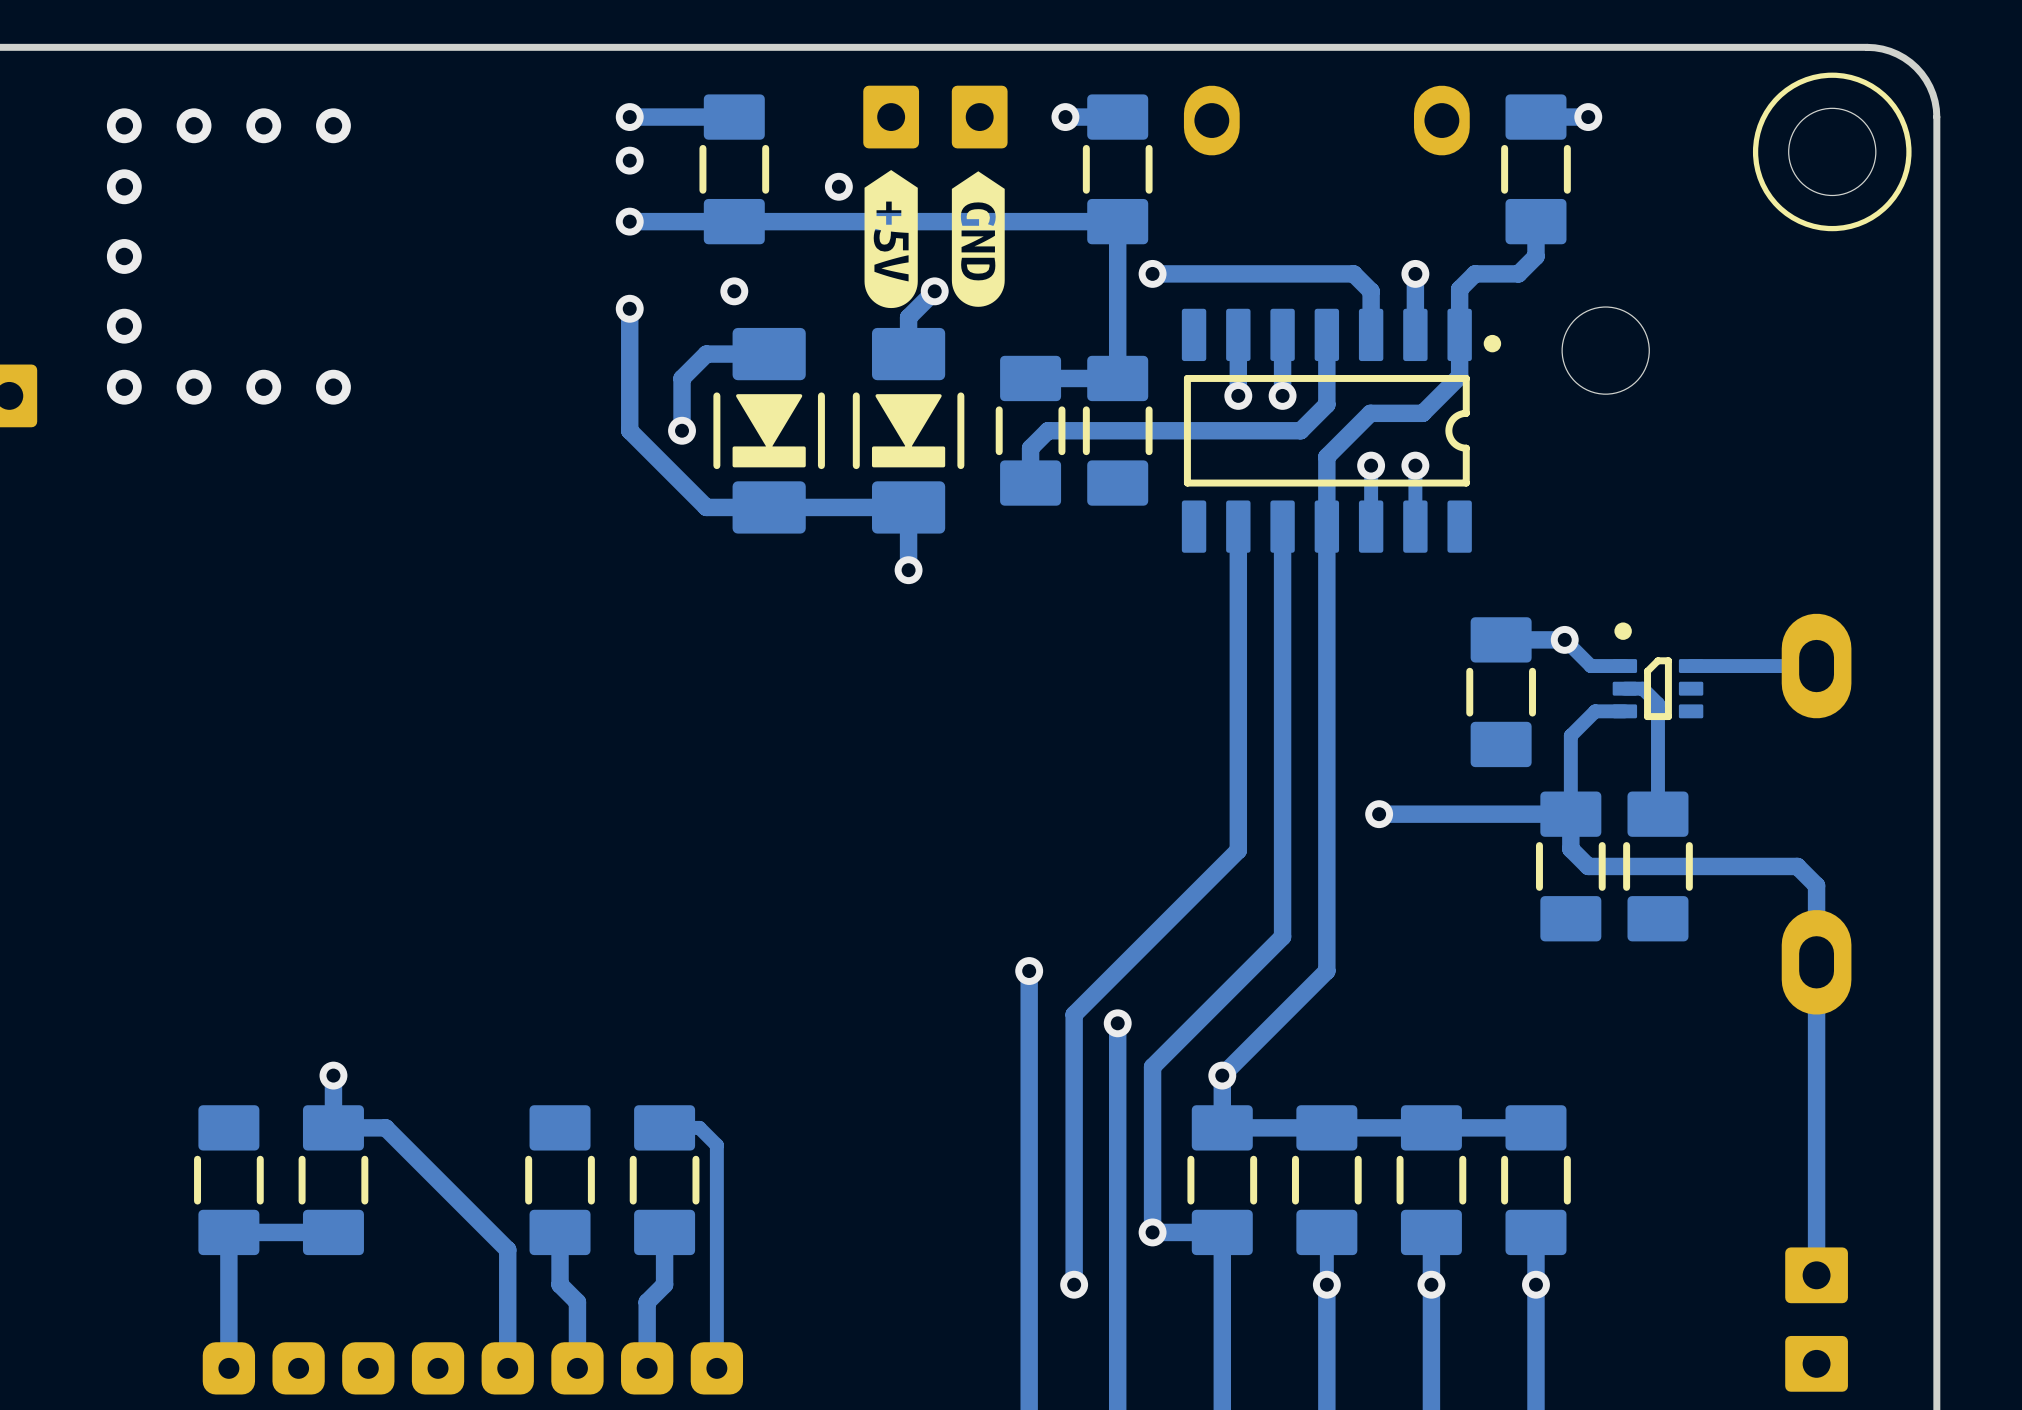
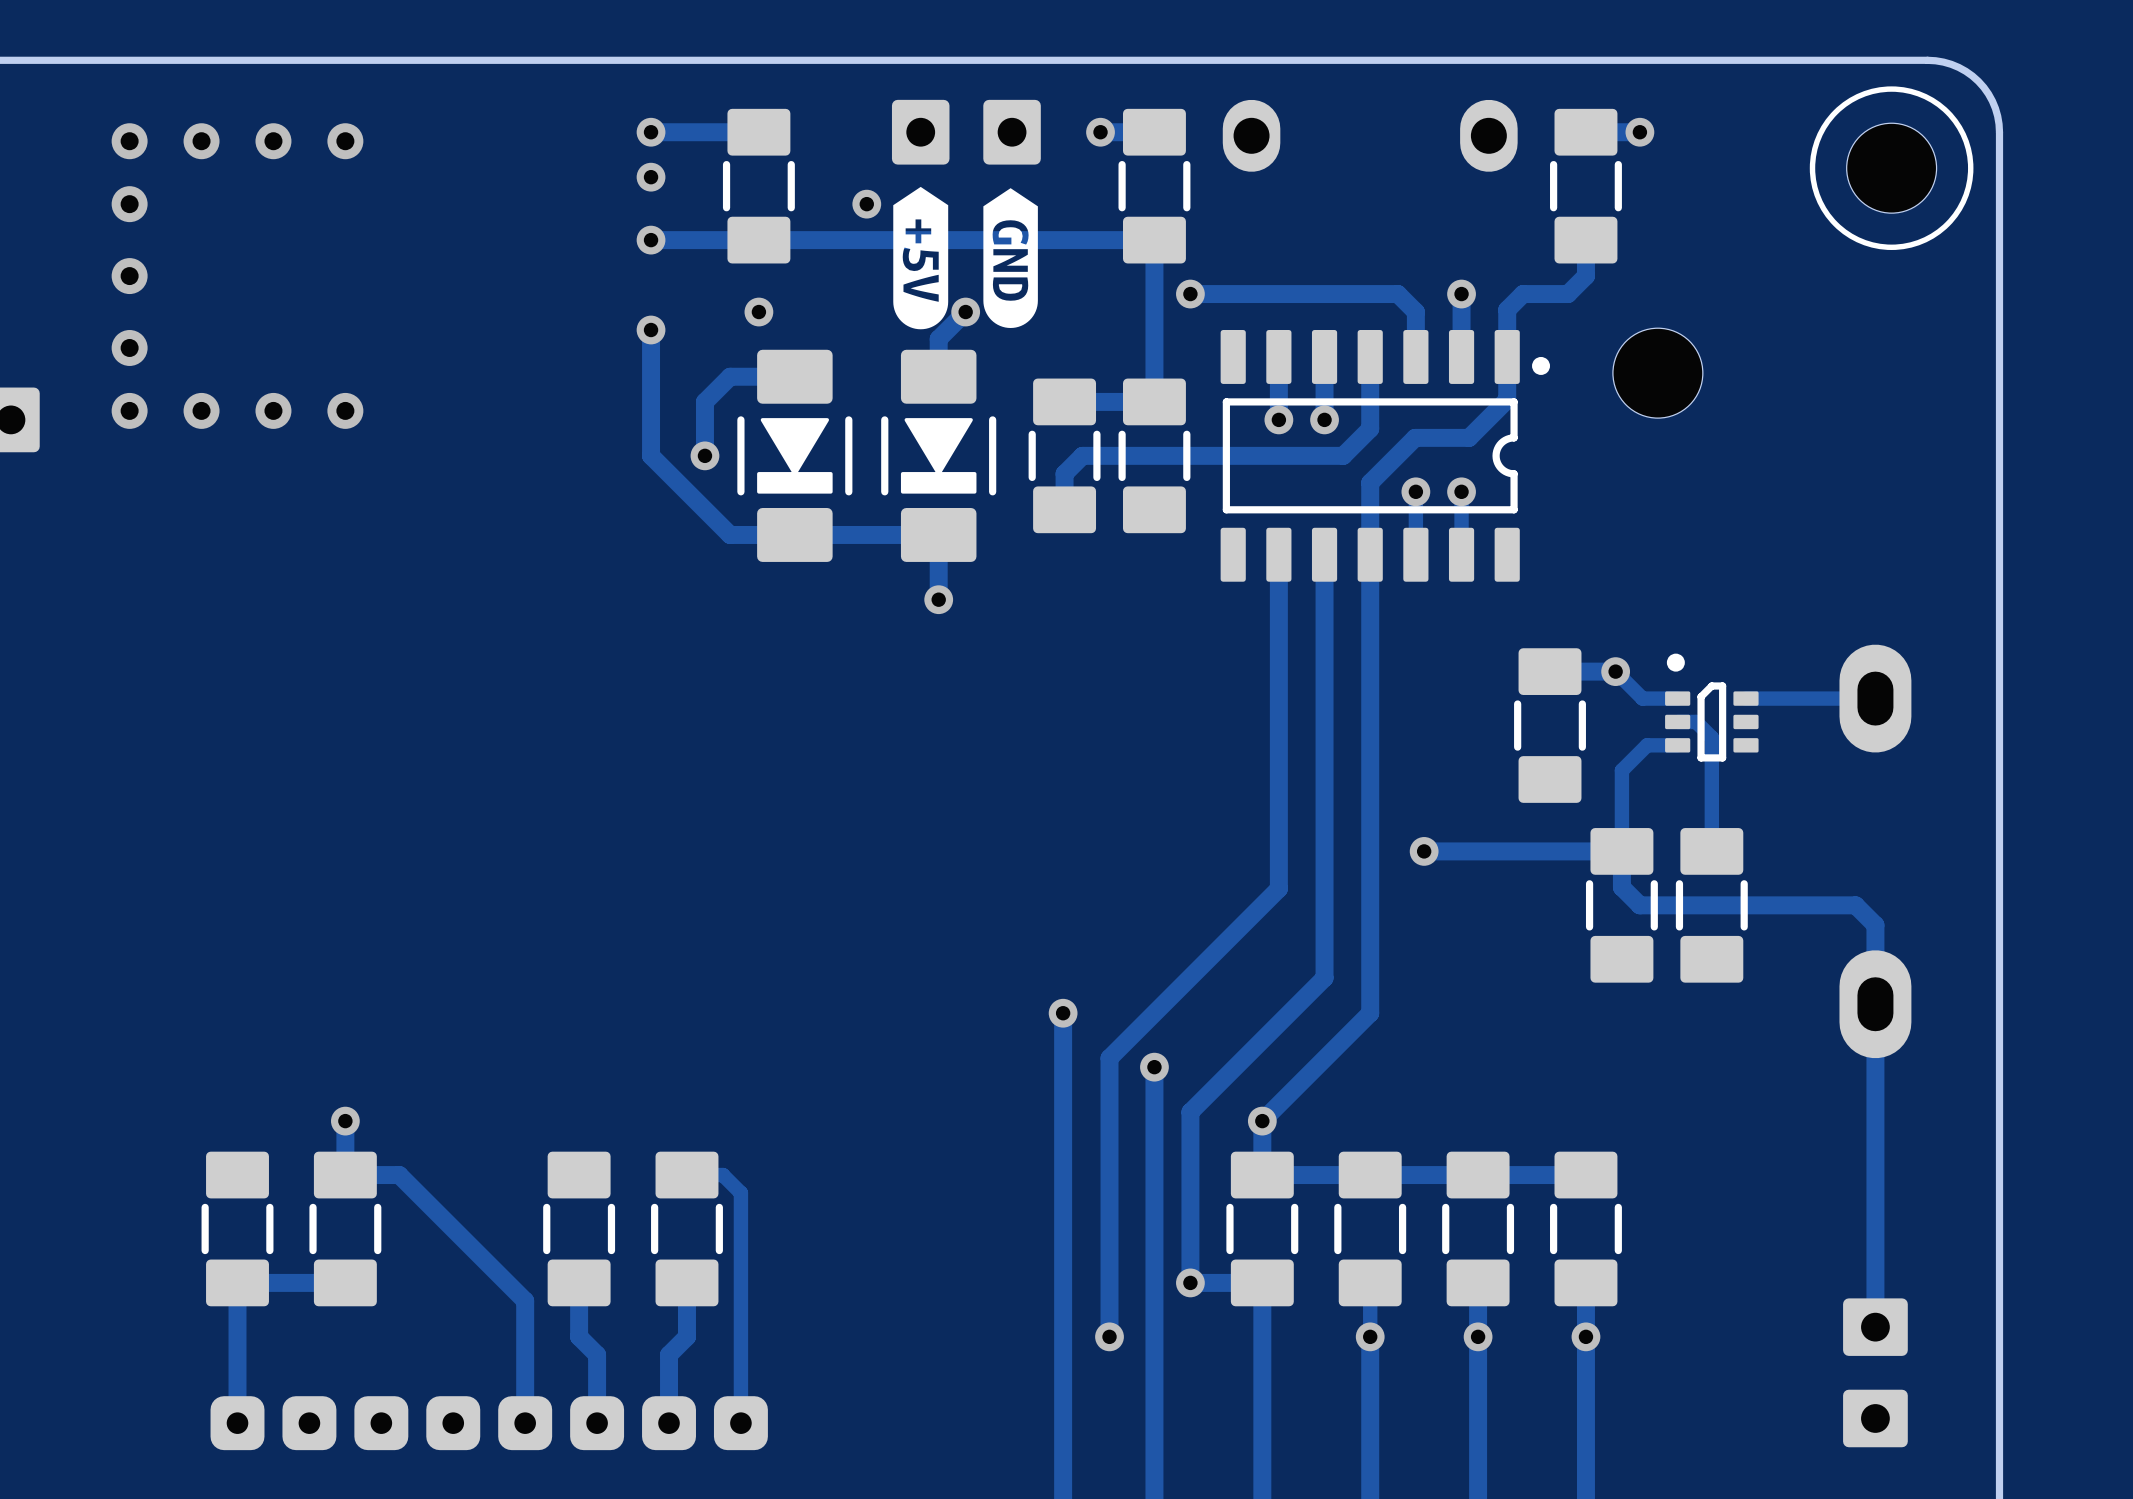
part footprint: [1612, 657, 1704, 721] -> [1665, 682, 1759, 762]

